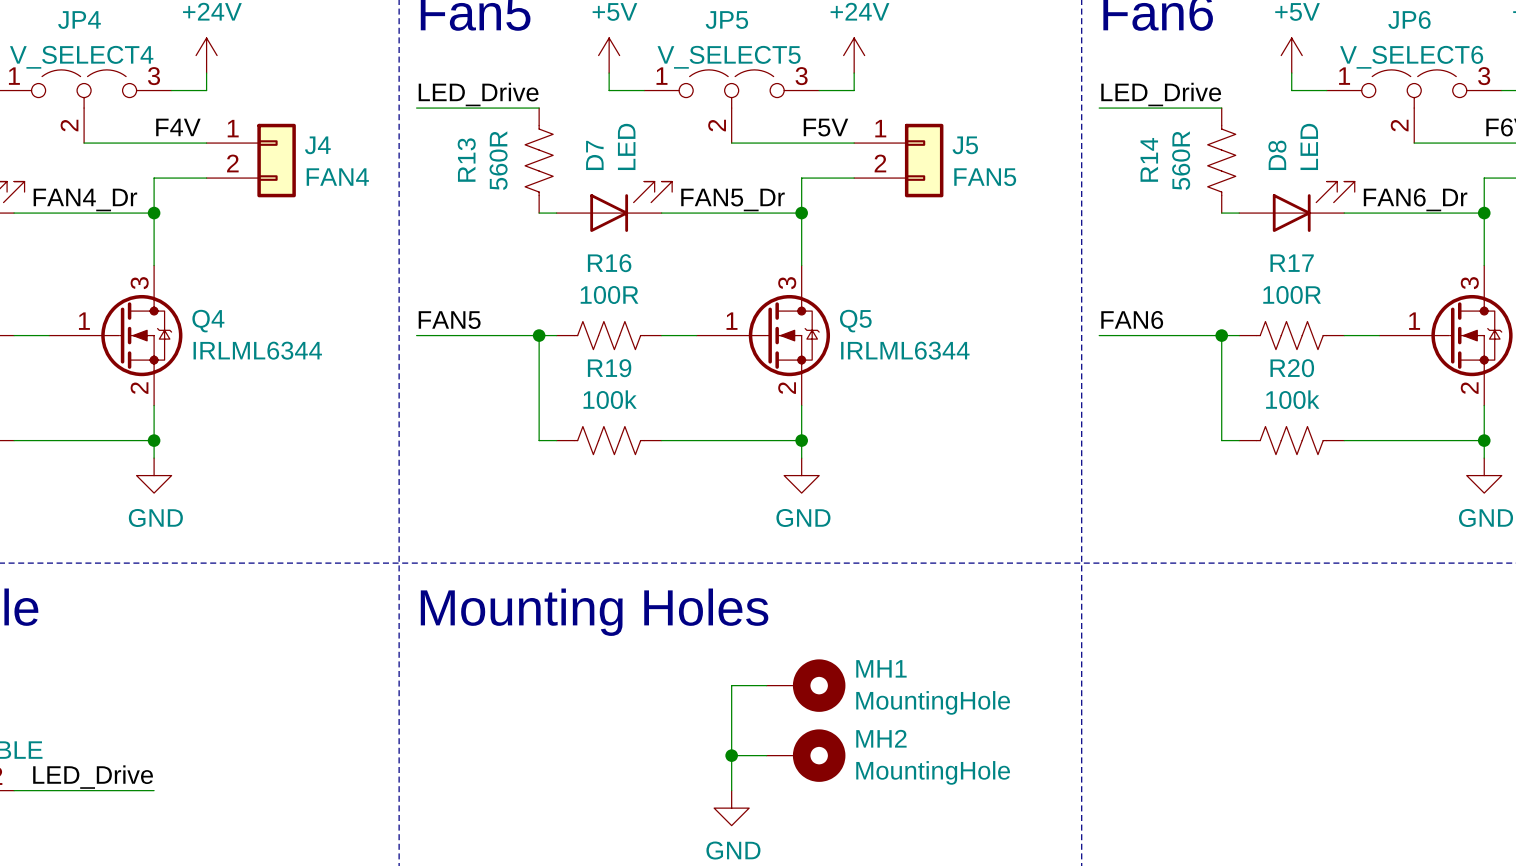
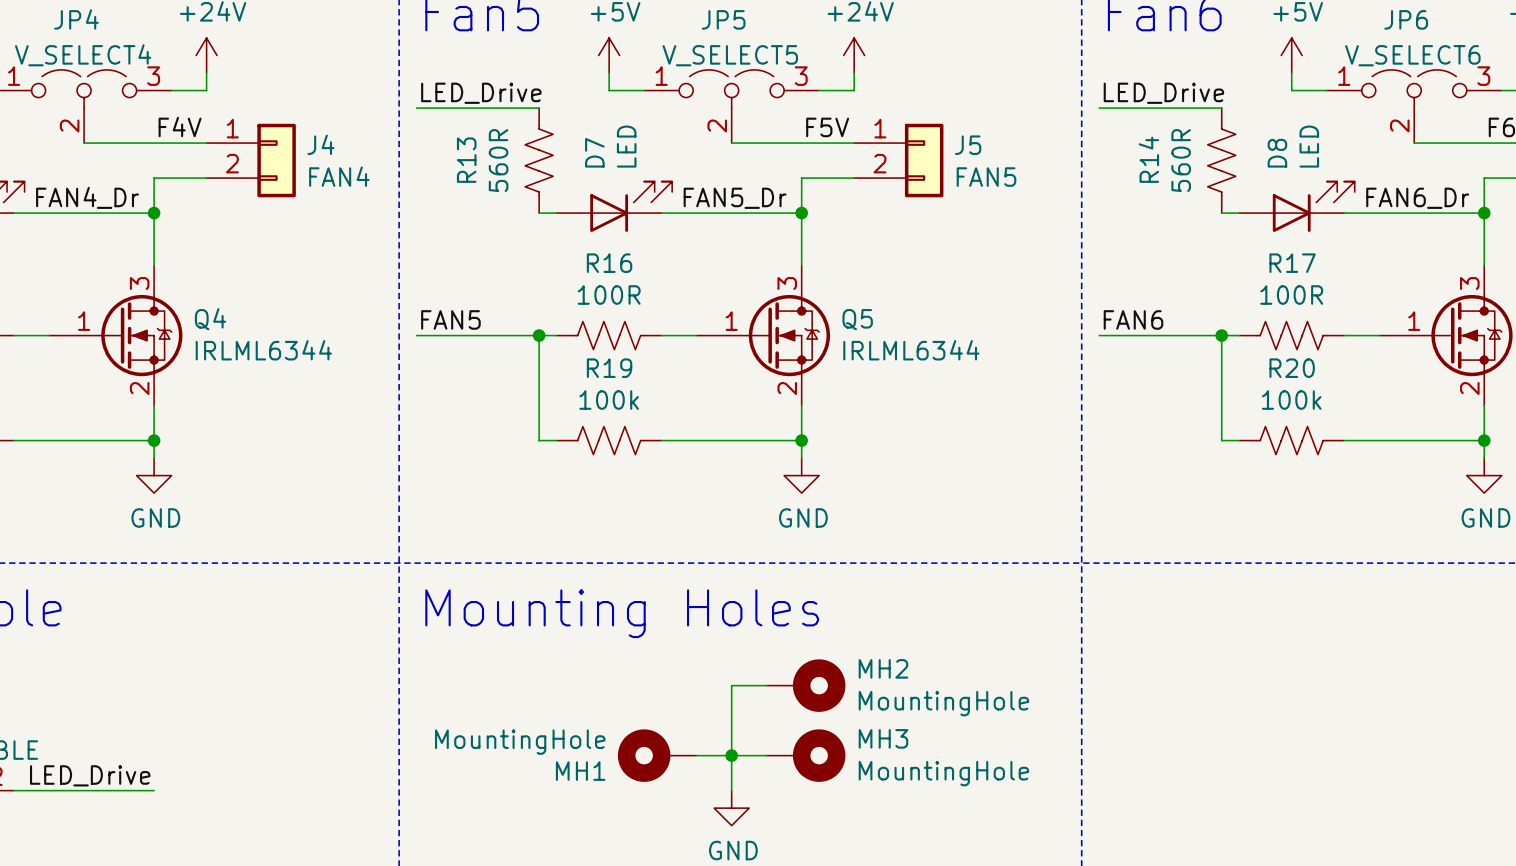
MH1 name: MH1 (881, 668) -> MH2 (883, 668)
MH2 name: MH2 (881, 738) -> MH3 (883, 738)
MH1: none -> MountingHole (657, 755)
wire: none -> (696, 755) (731, 755)

